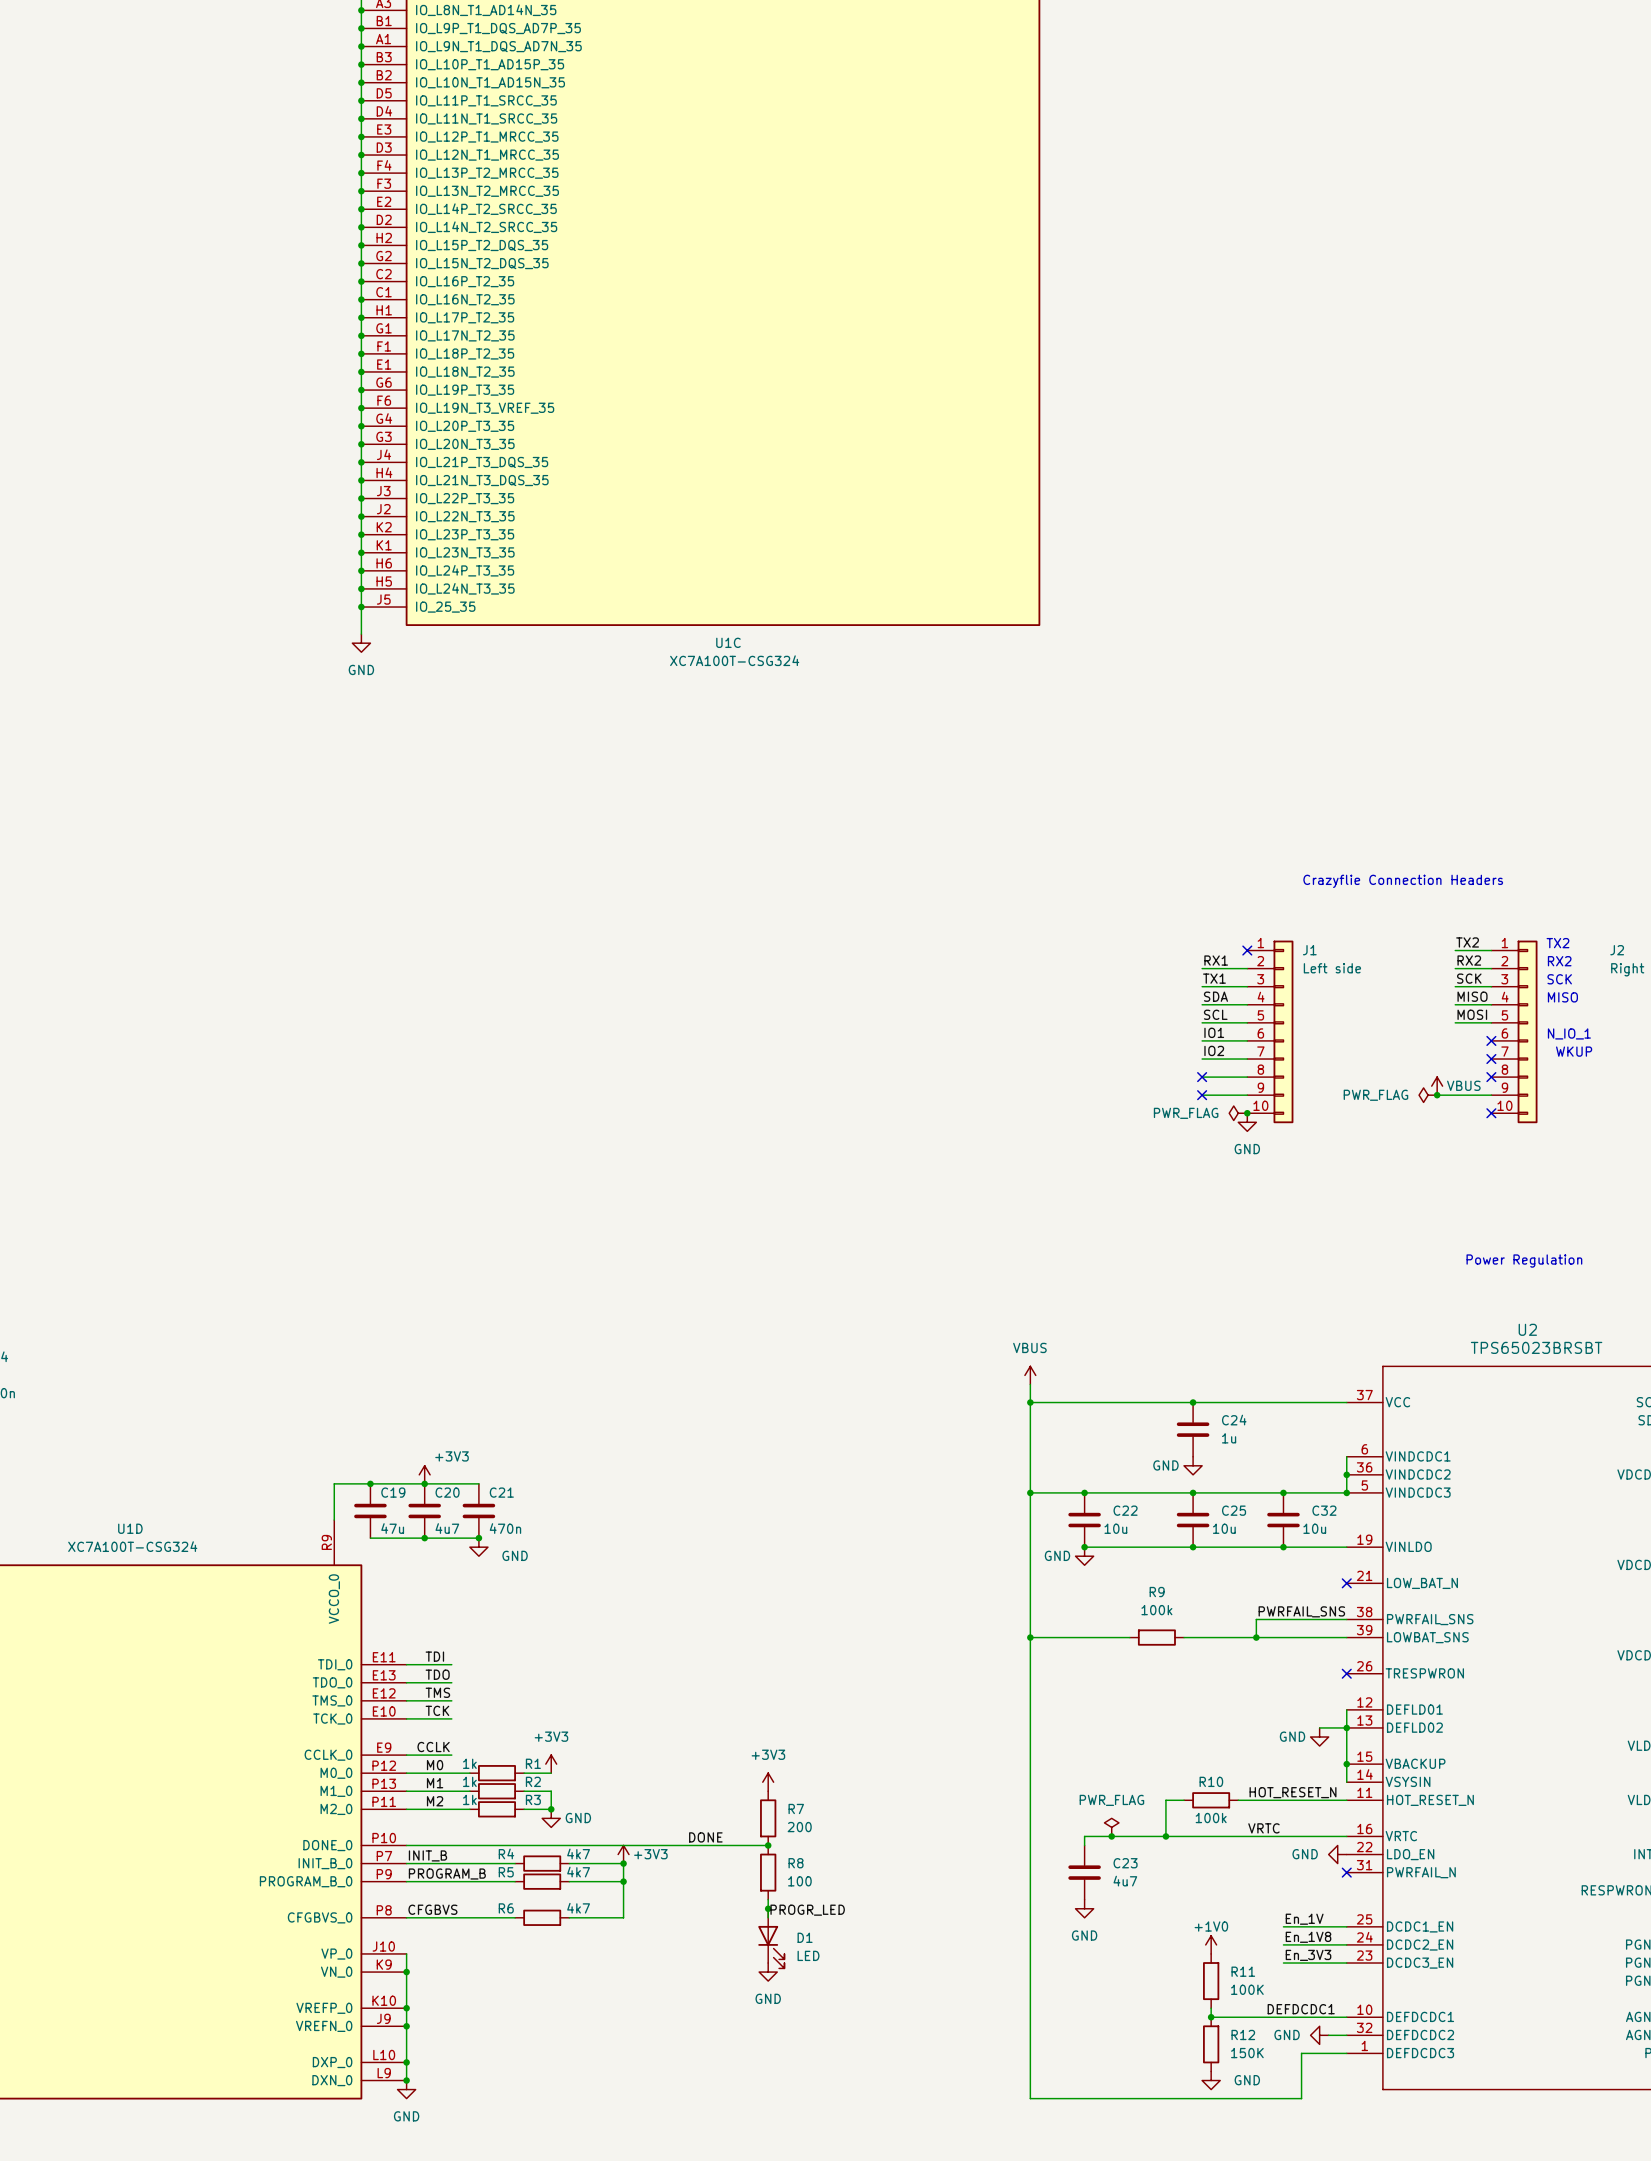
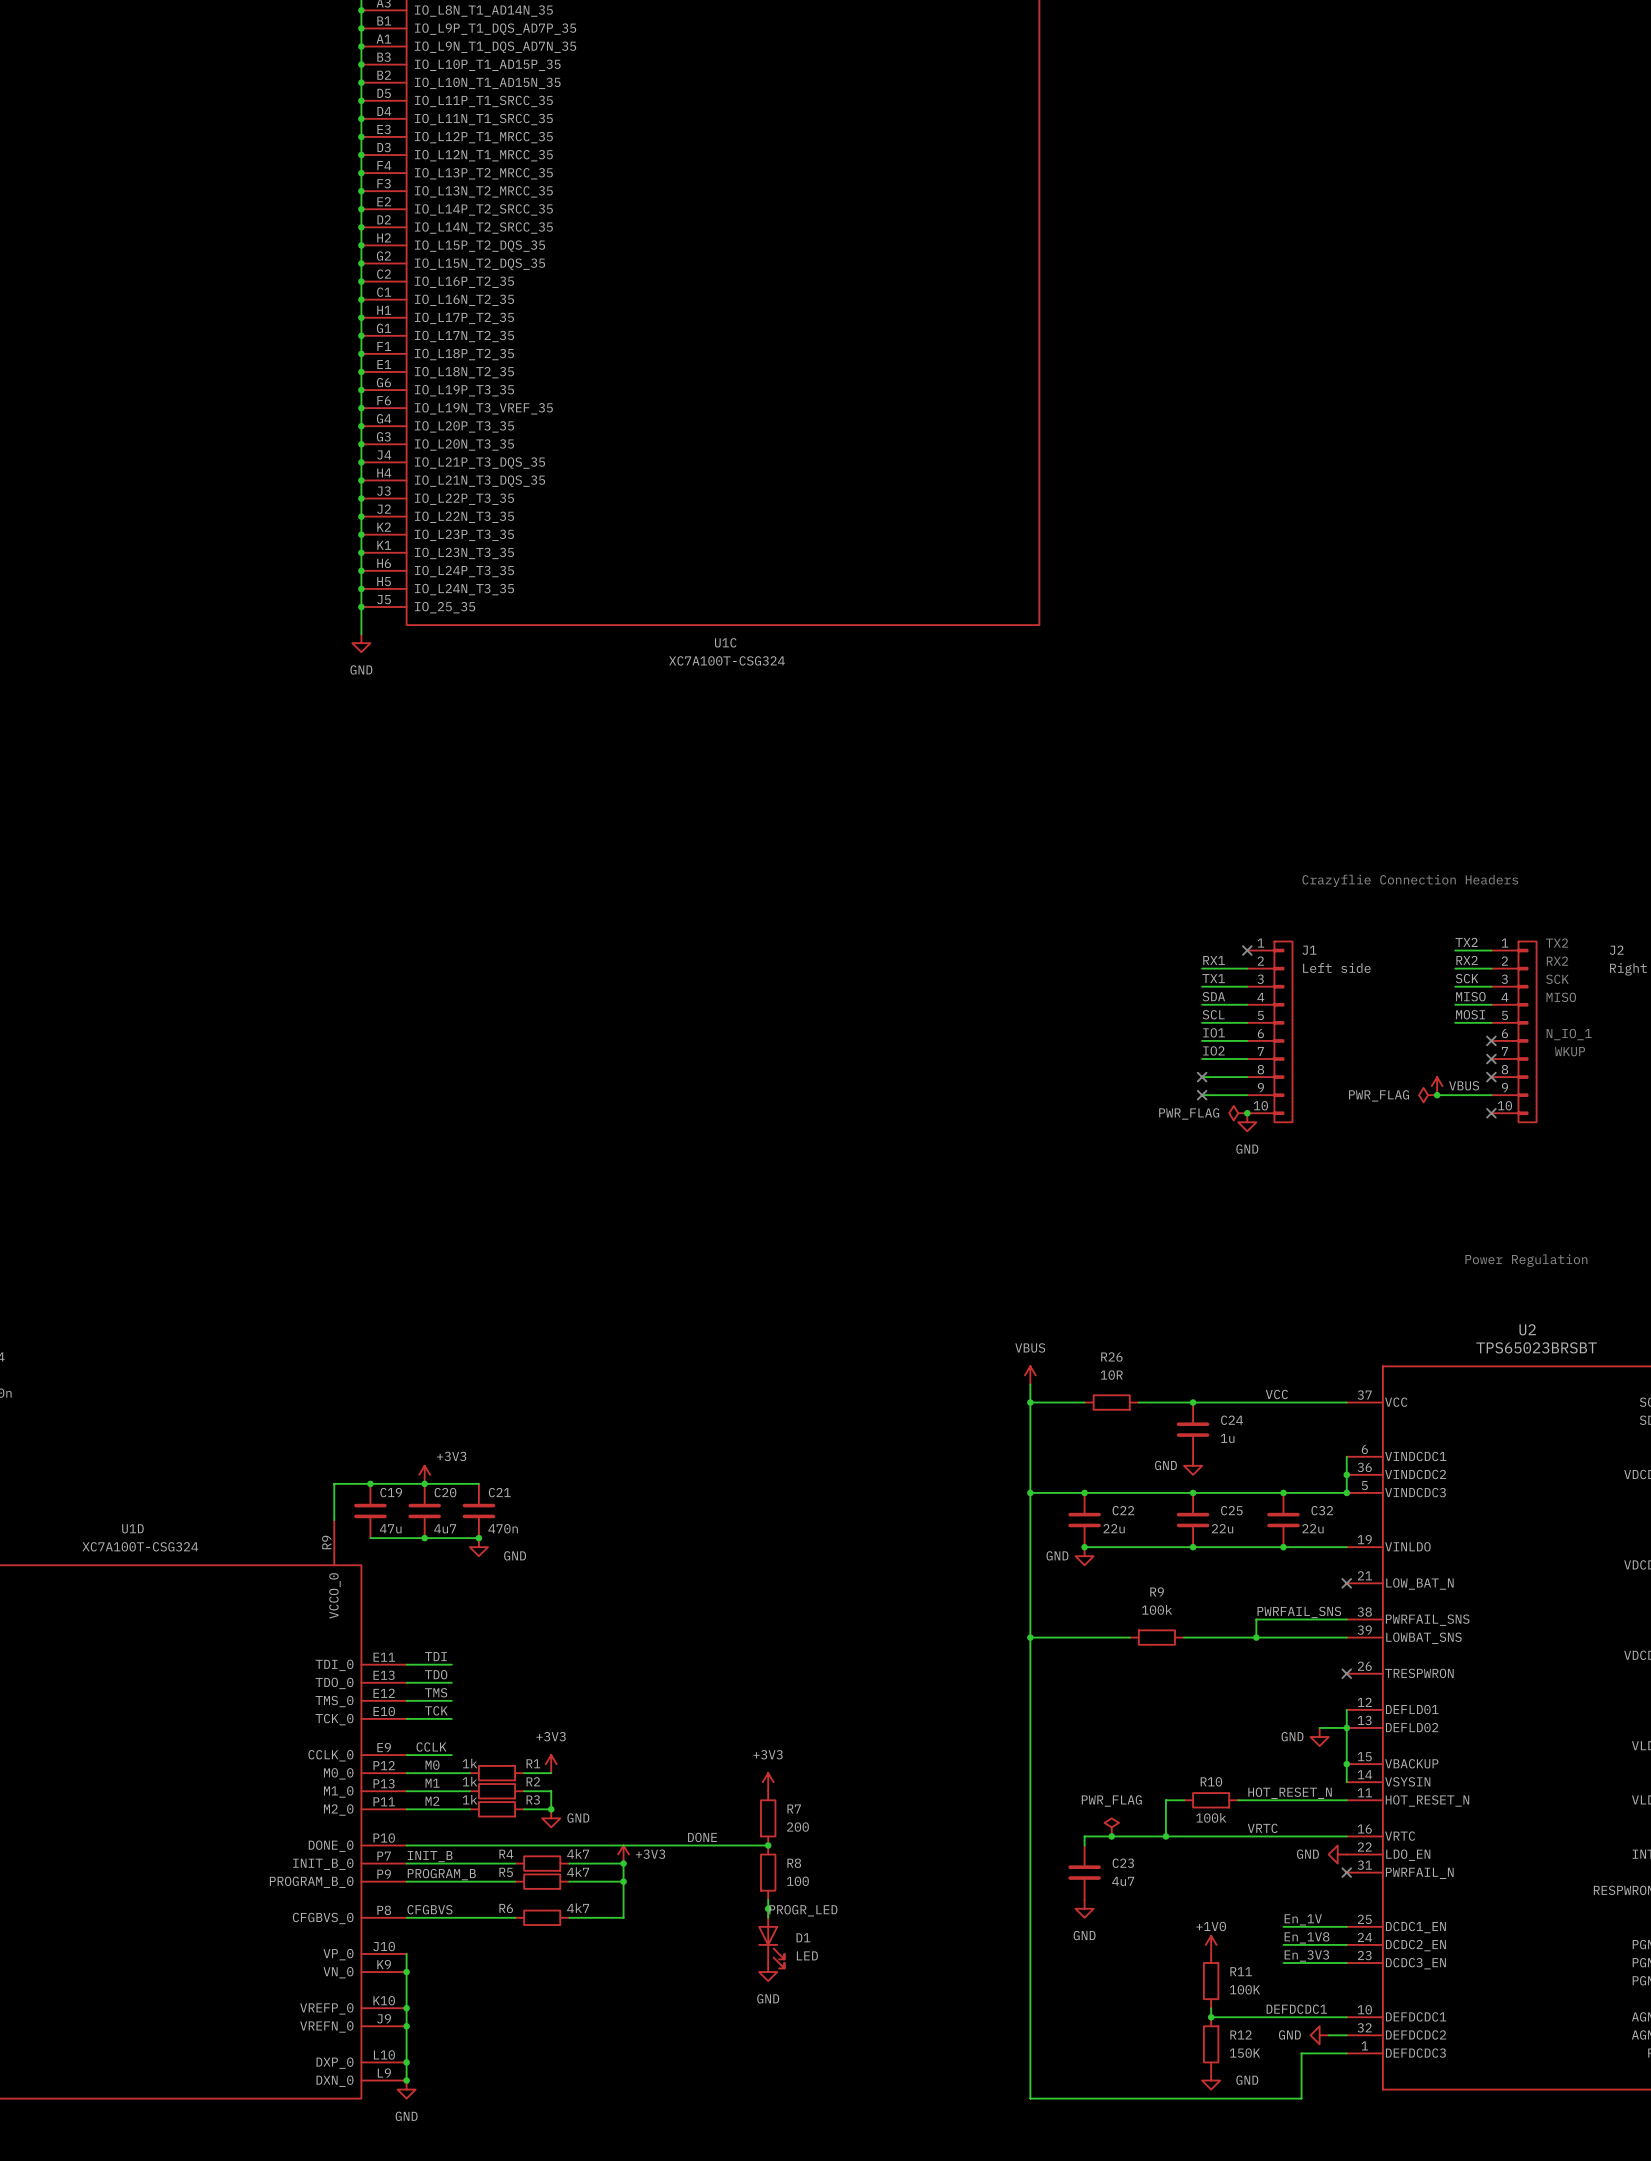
label: none -> VCC (1276, 1394)
wire: (1084, 1402) (1138, 1402) -> none
R26: none -> 10R (1111, 1402)
C22 value: 10u (1115, 1528) -> 22u (1114, 1528)
C25 value: 10u (1224, 1528) -> 22u (1222, 1528)
C32 value: 10u (1314, 1528) -> 22u (1312, 1528)

